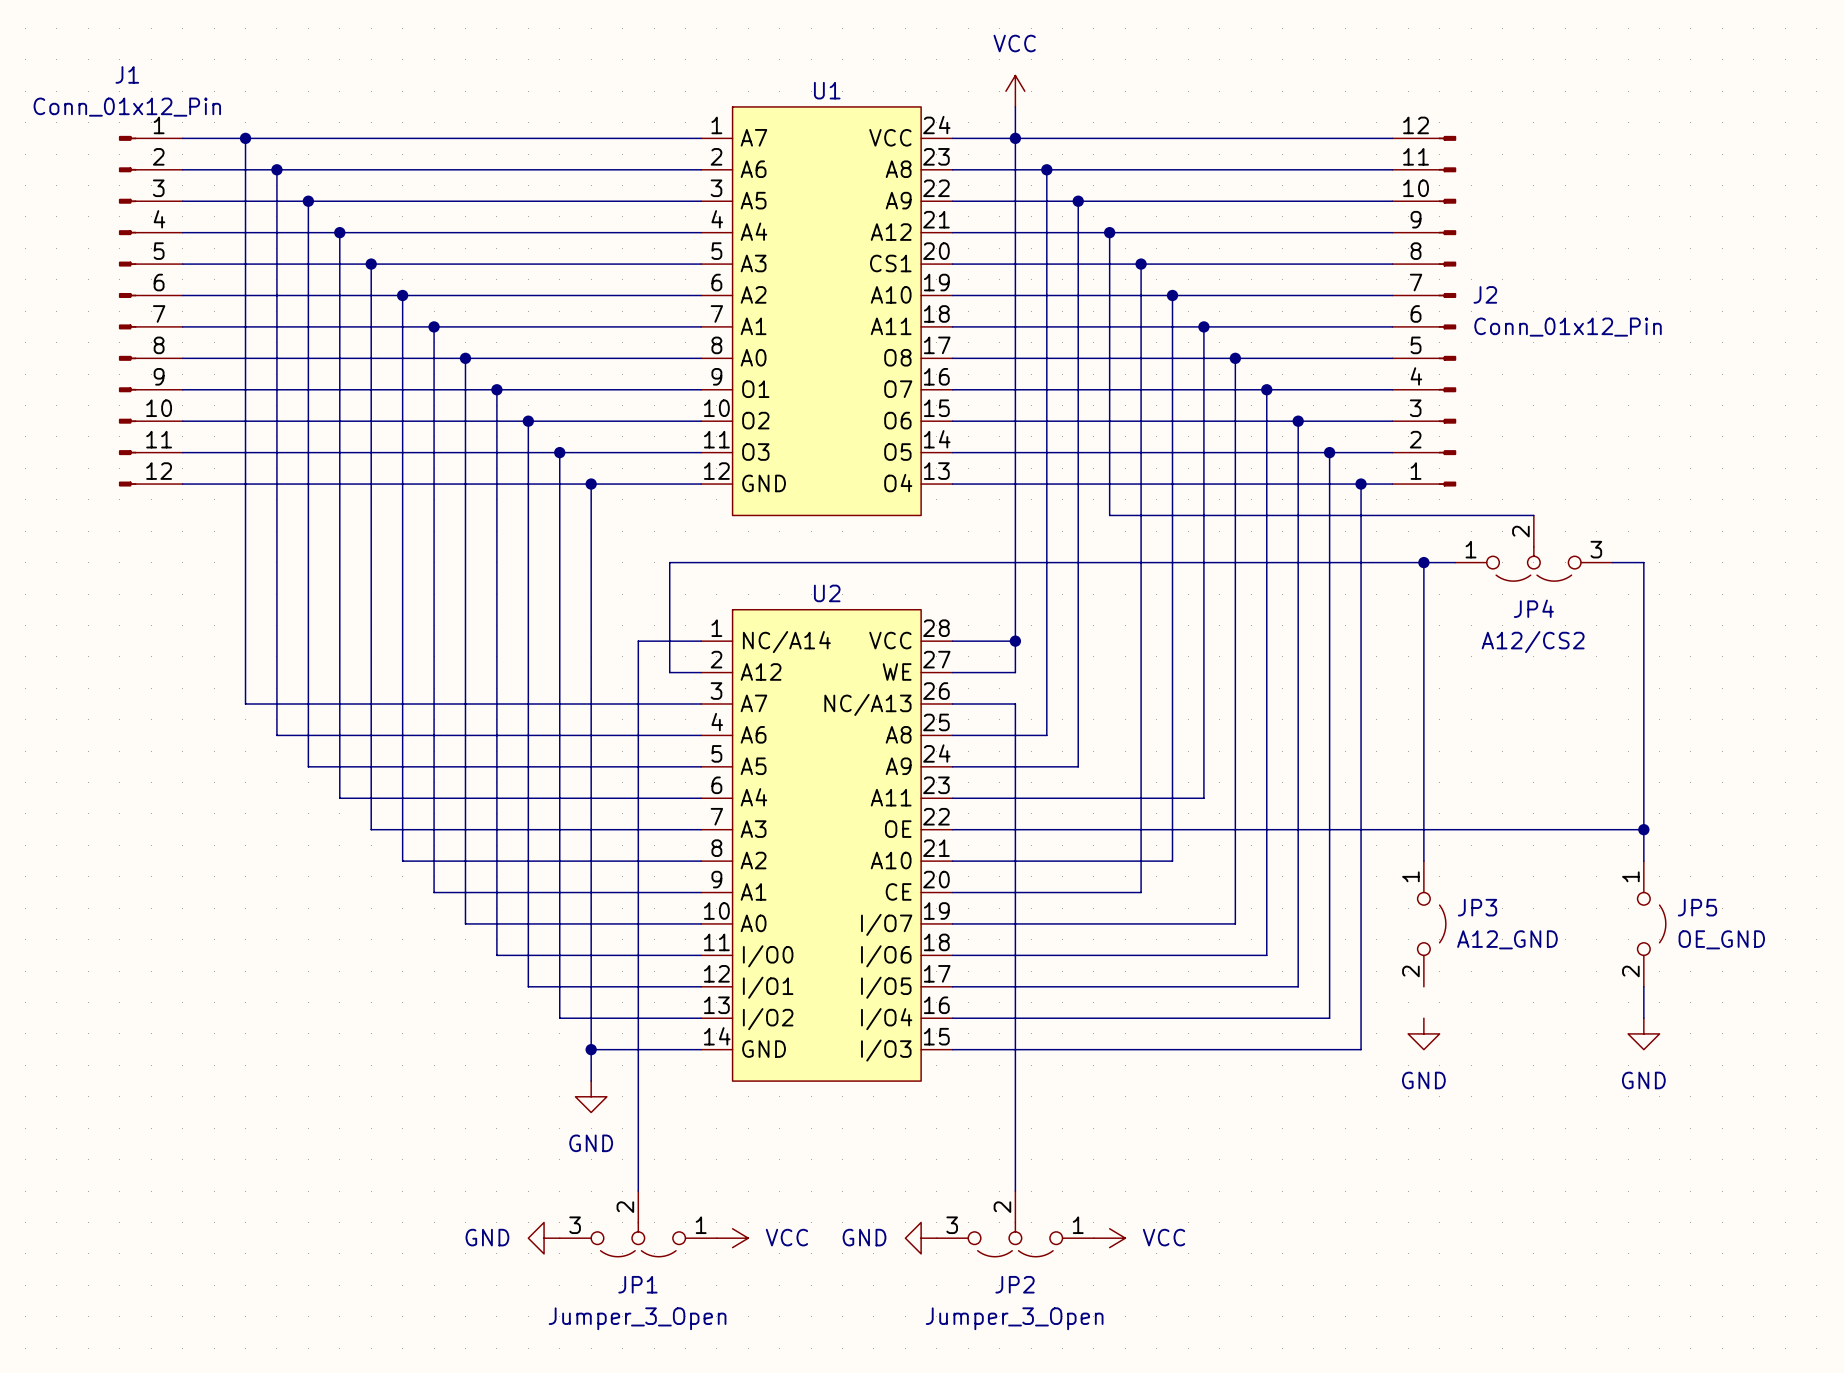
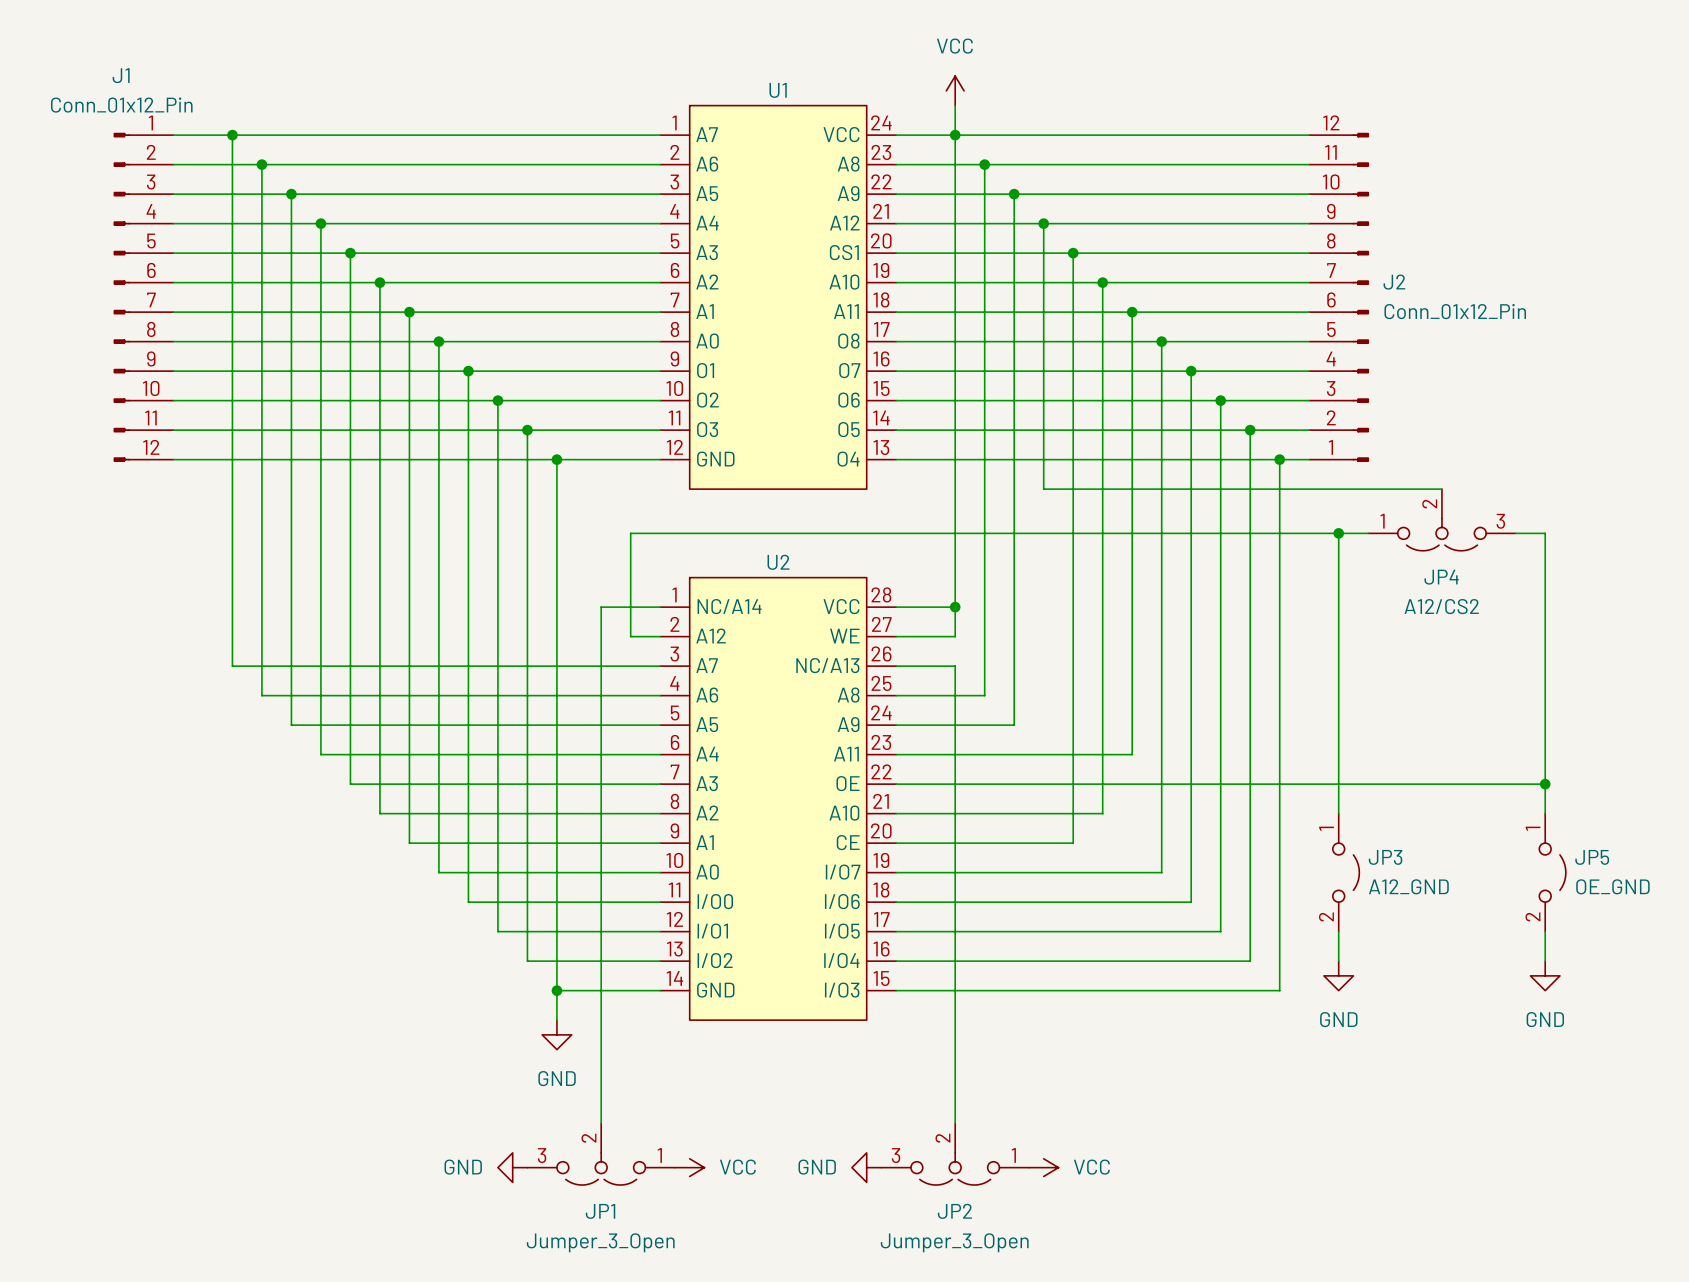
wire: none -> (1338, 931) (1338, 961)

